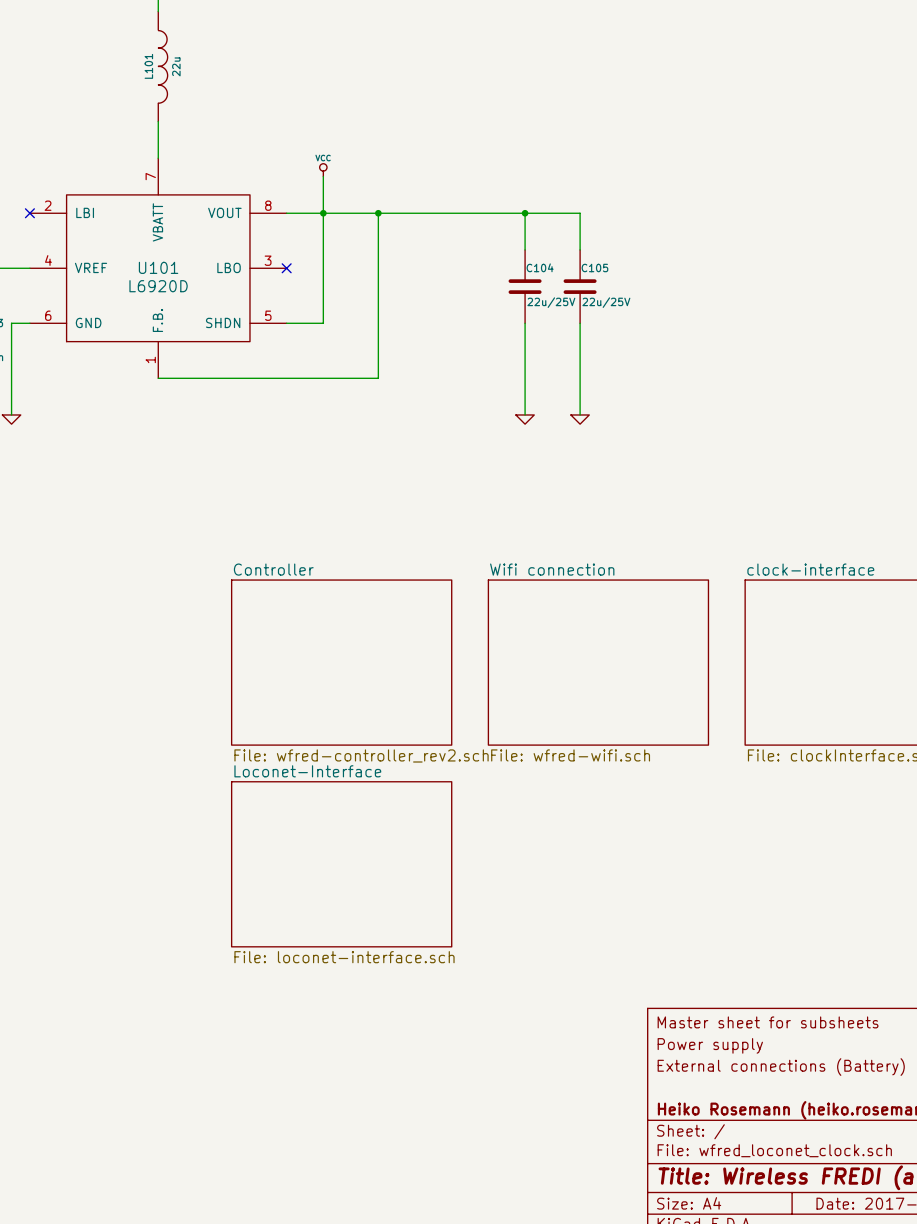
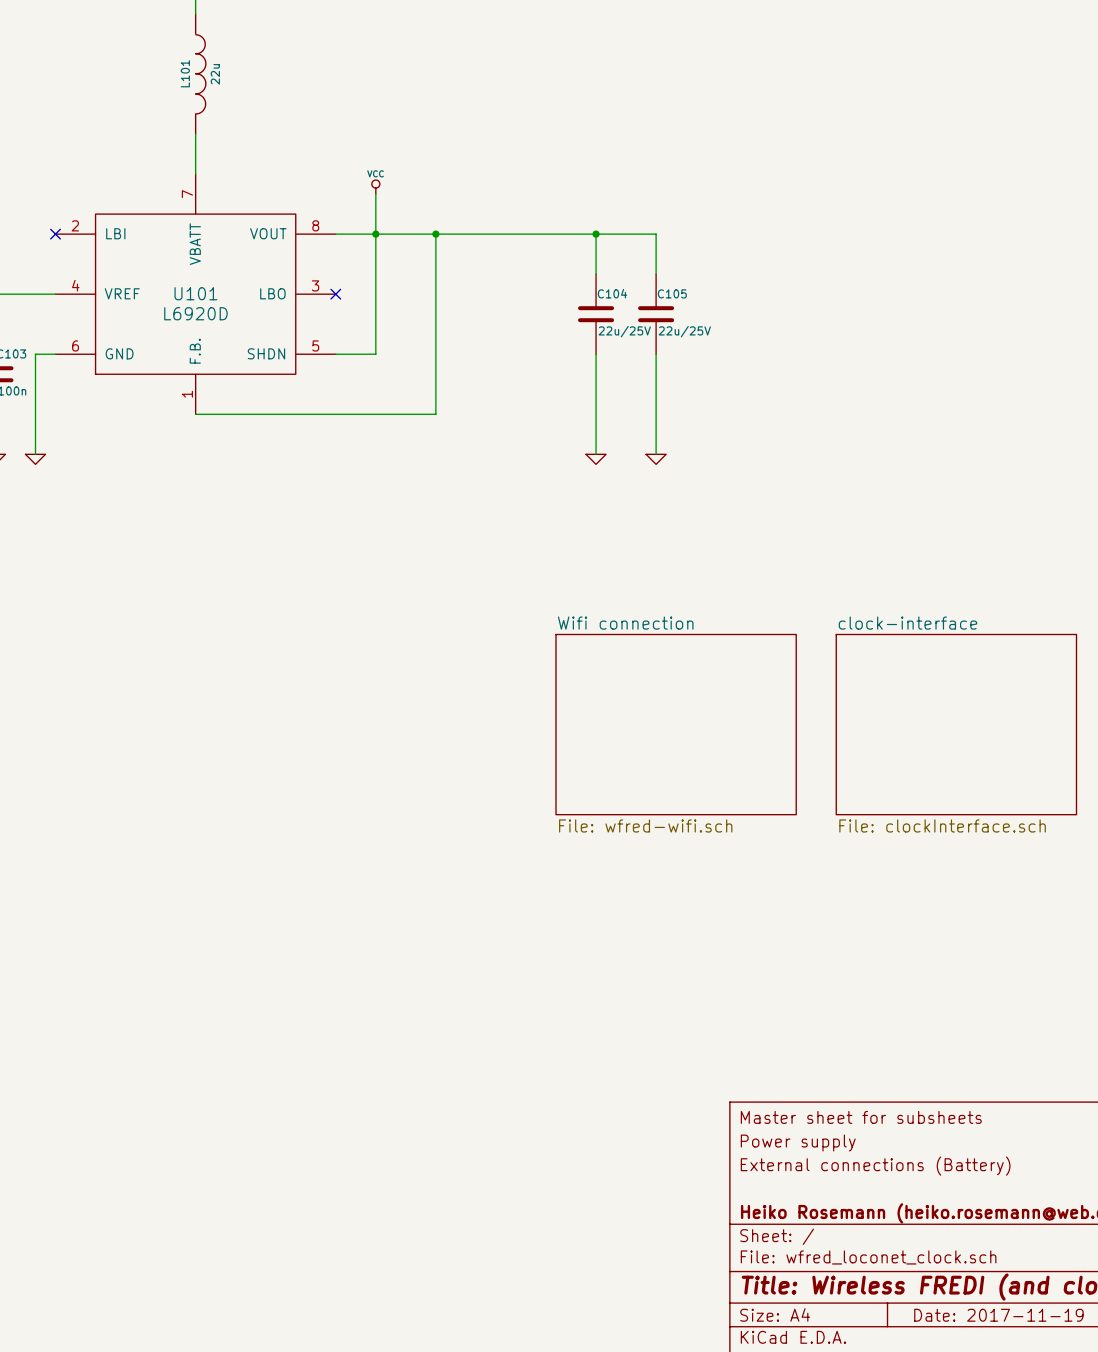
sheet Controller: File: wfred-controller_rev2.sch (341, 662) -> none
sheet Loconet-Interface: File: loconet-interface.sch (341, 864) -> none

